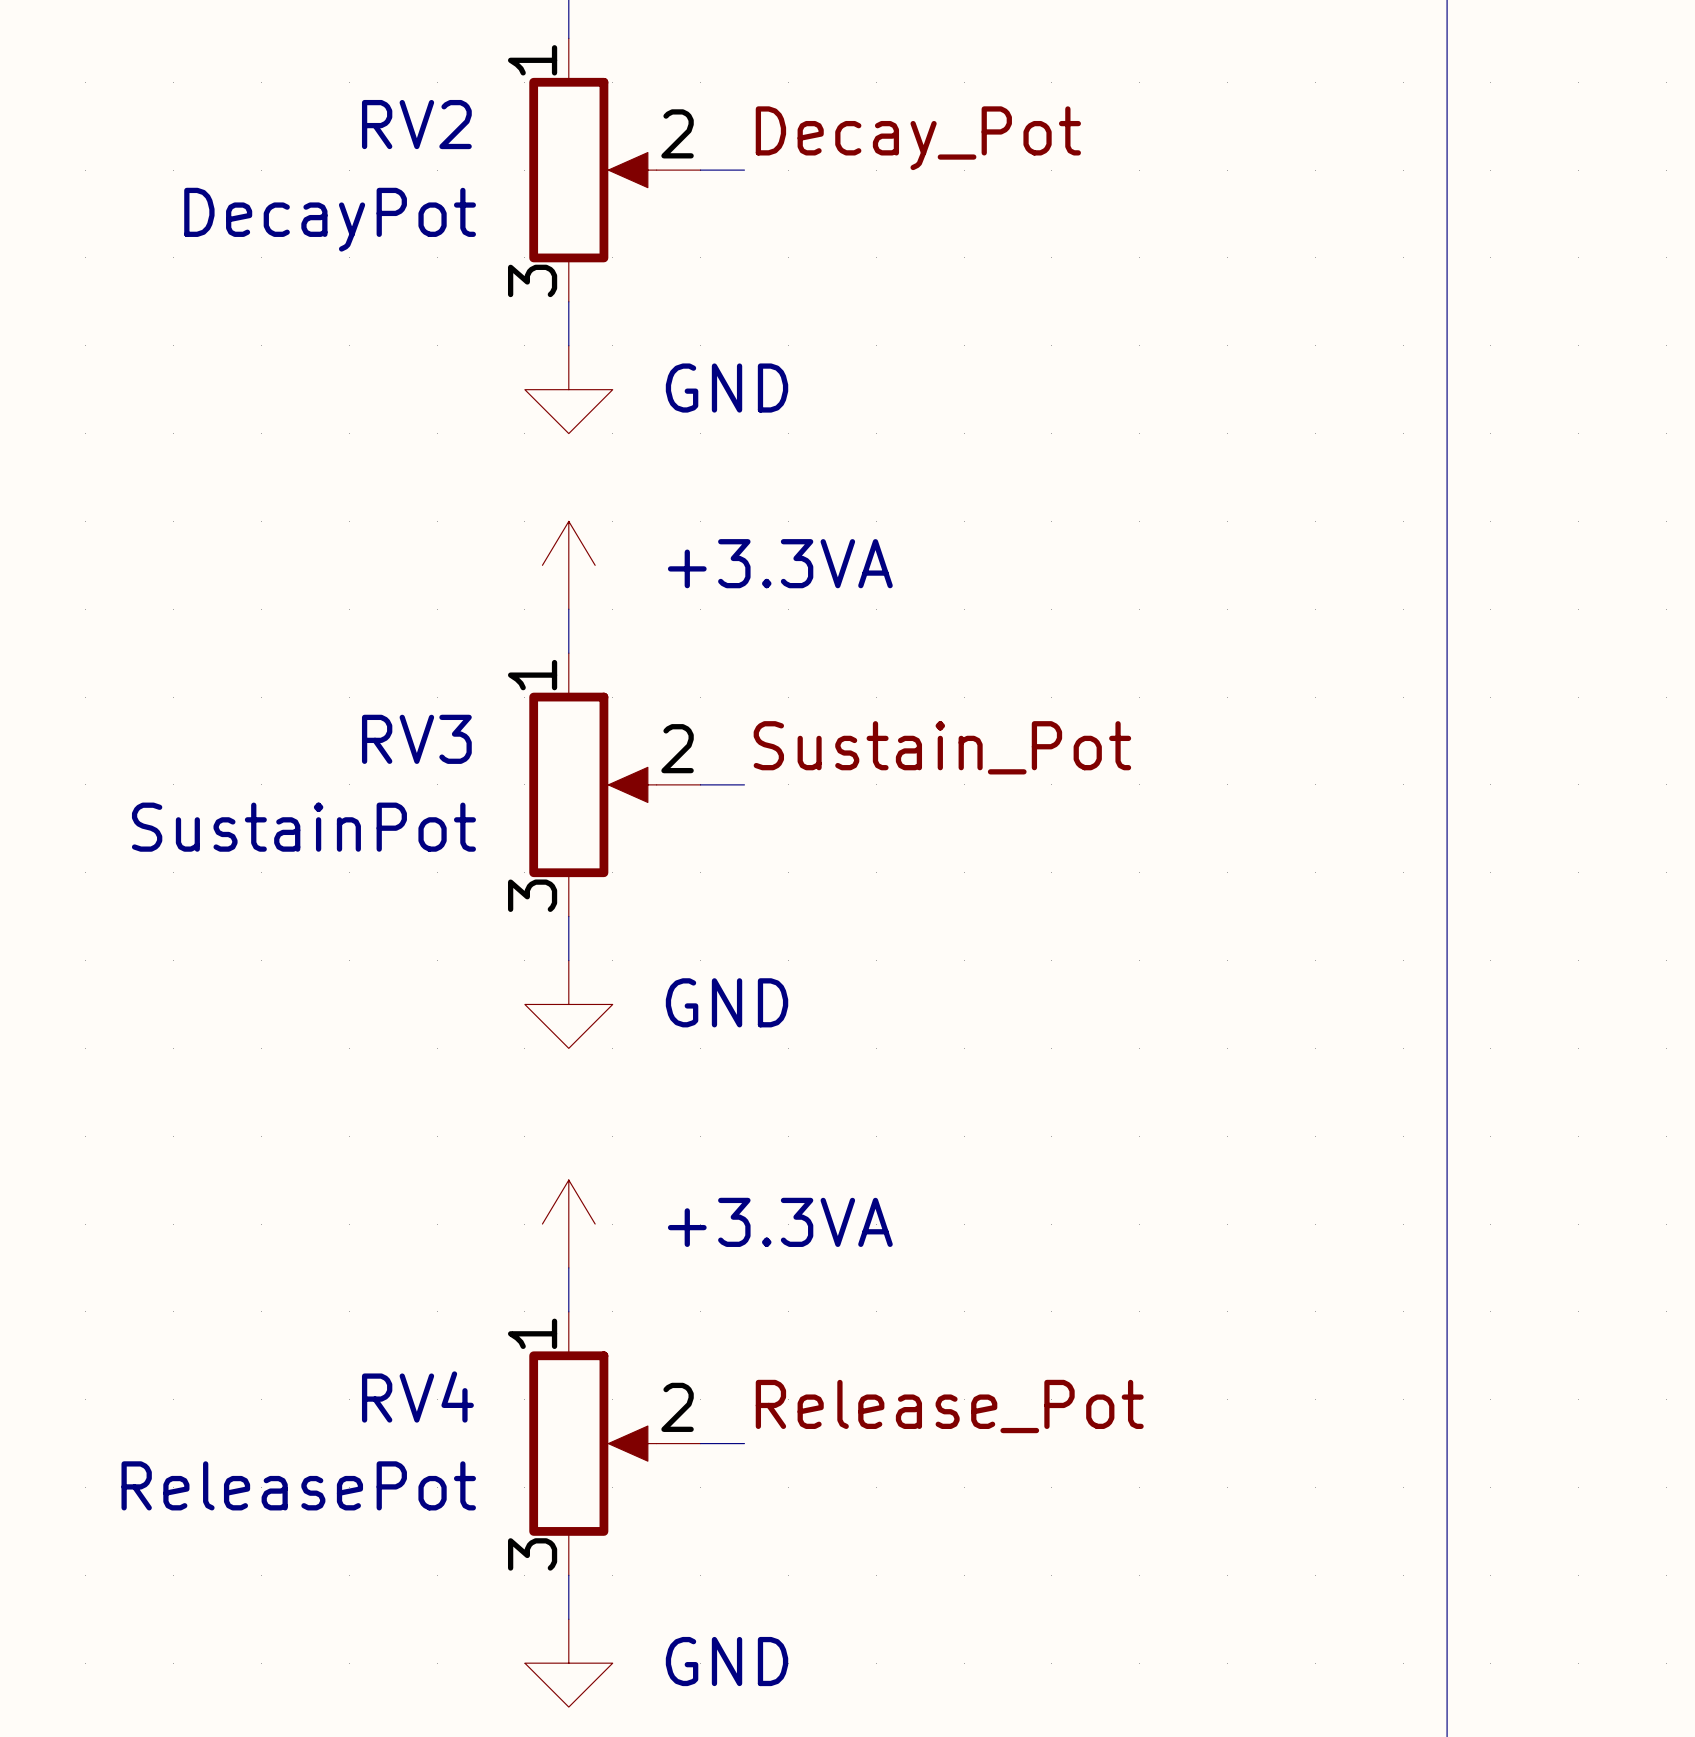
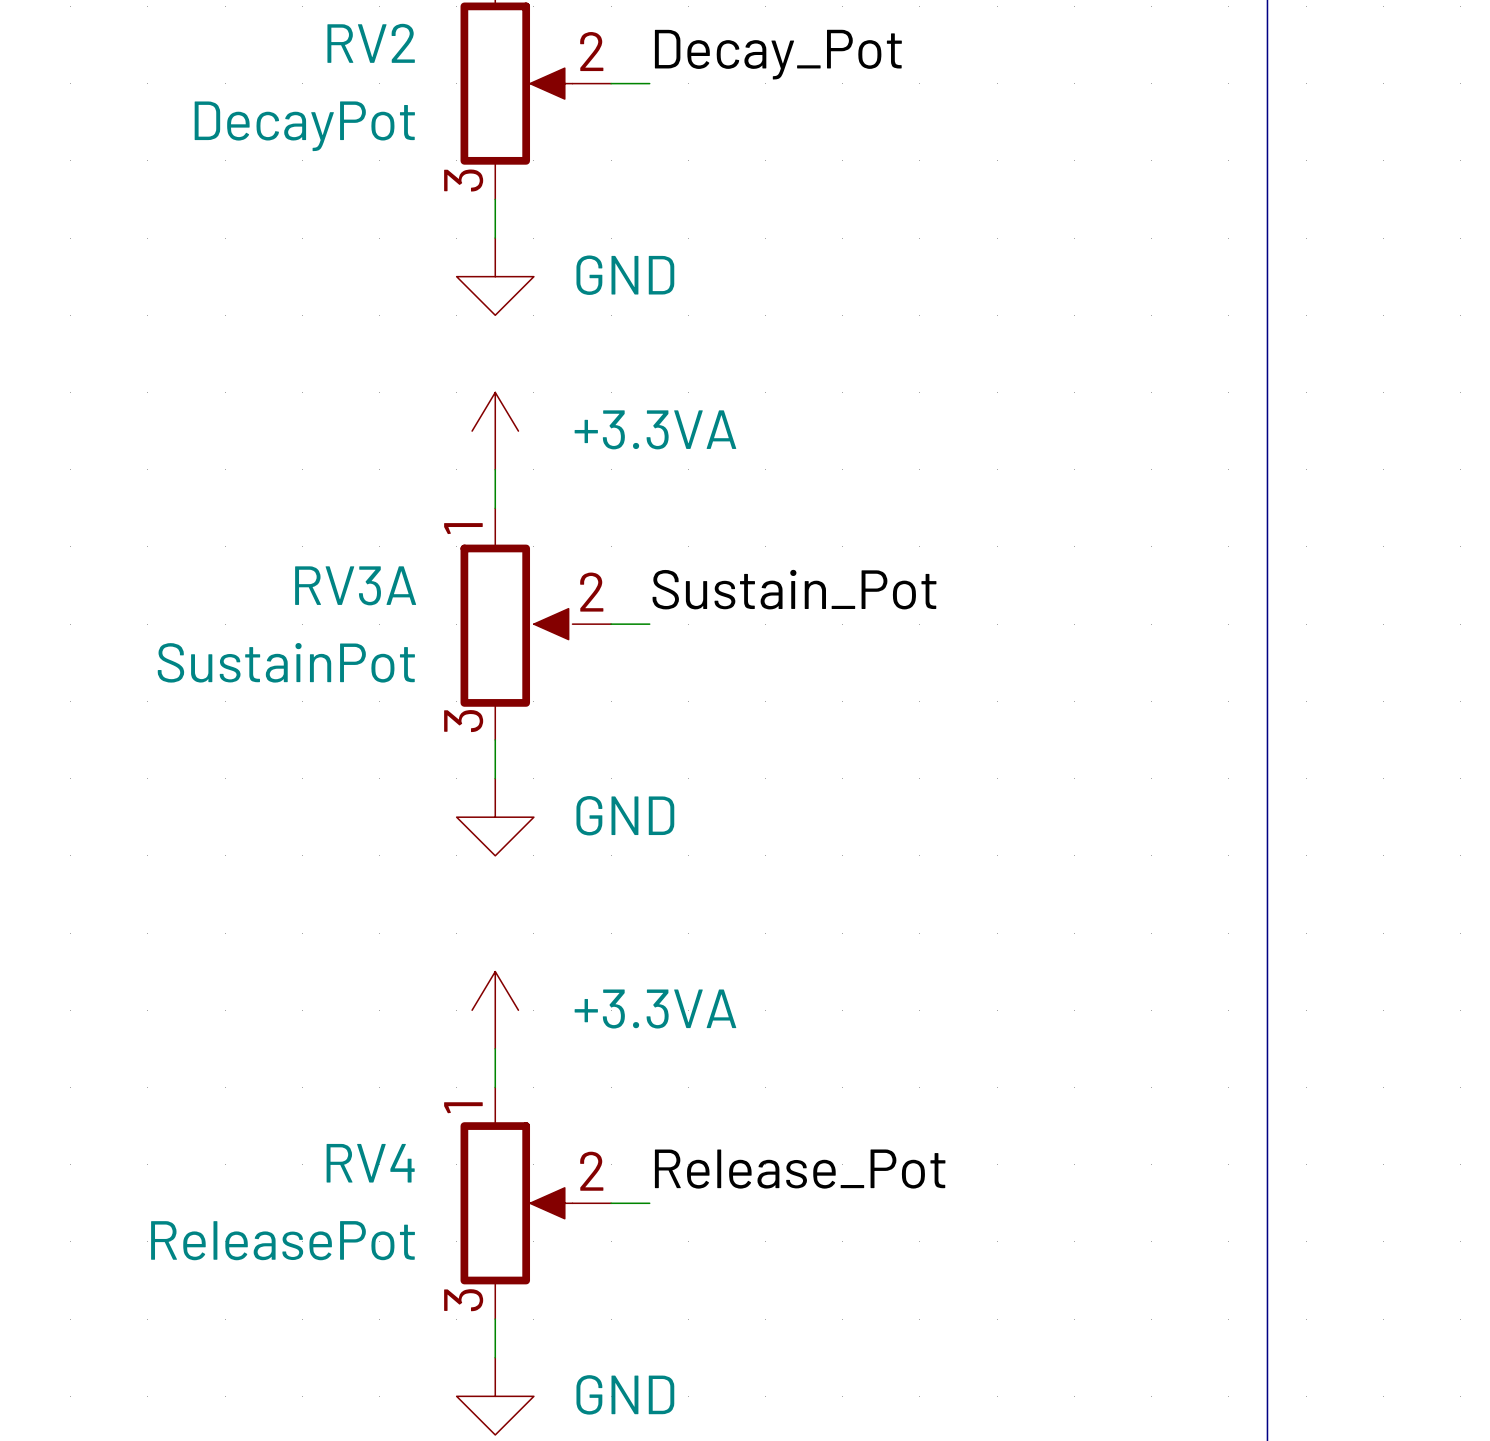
RV3: SustainPot (614, 784) -> none
RV3A: none -> SustainPot (535, 624)

